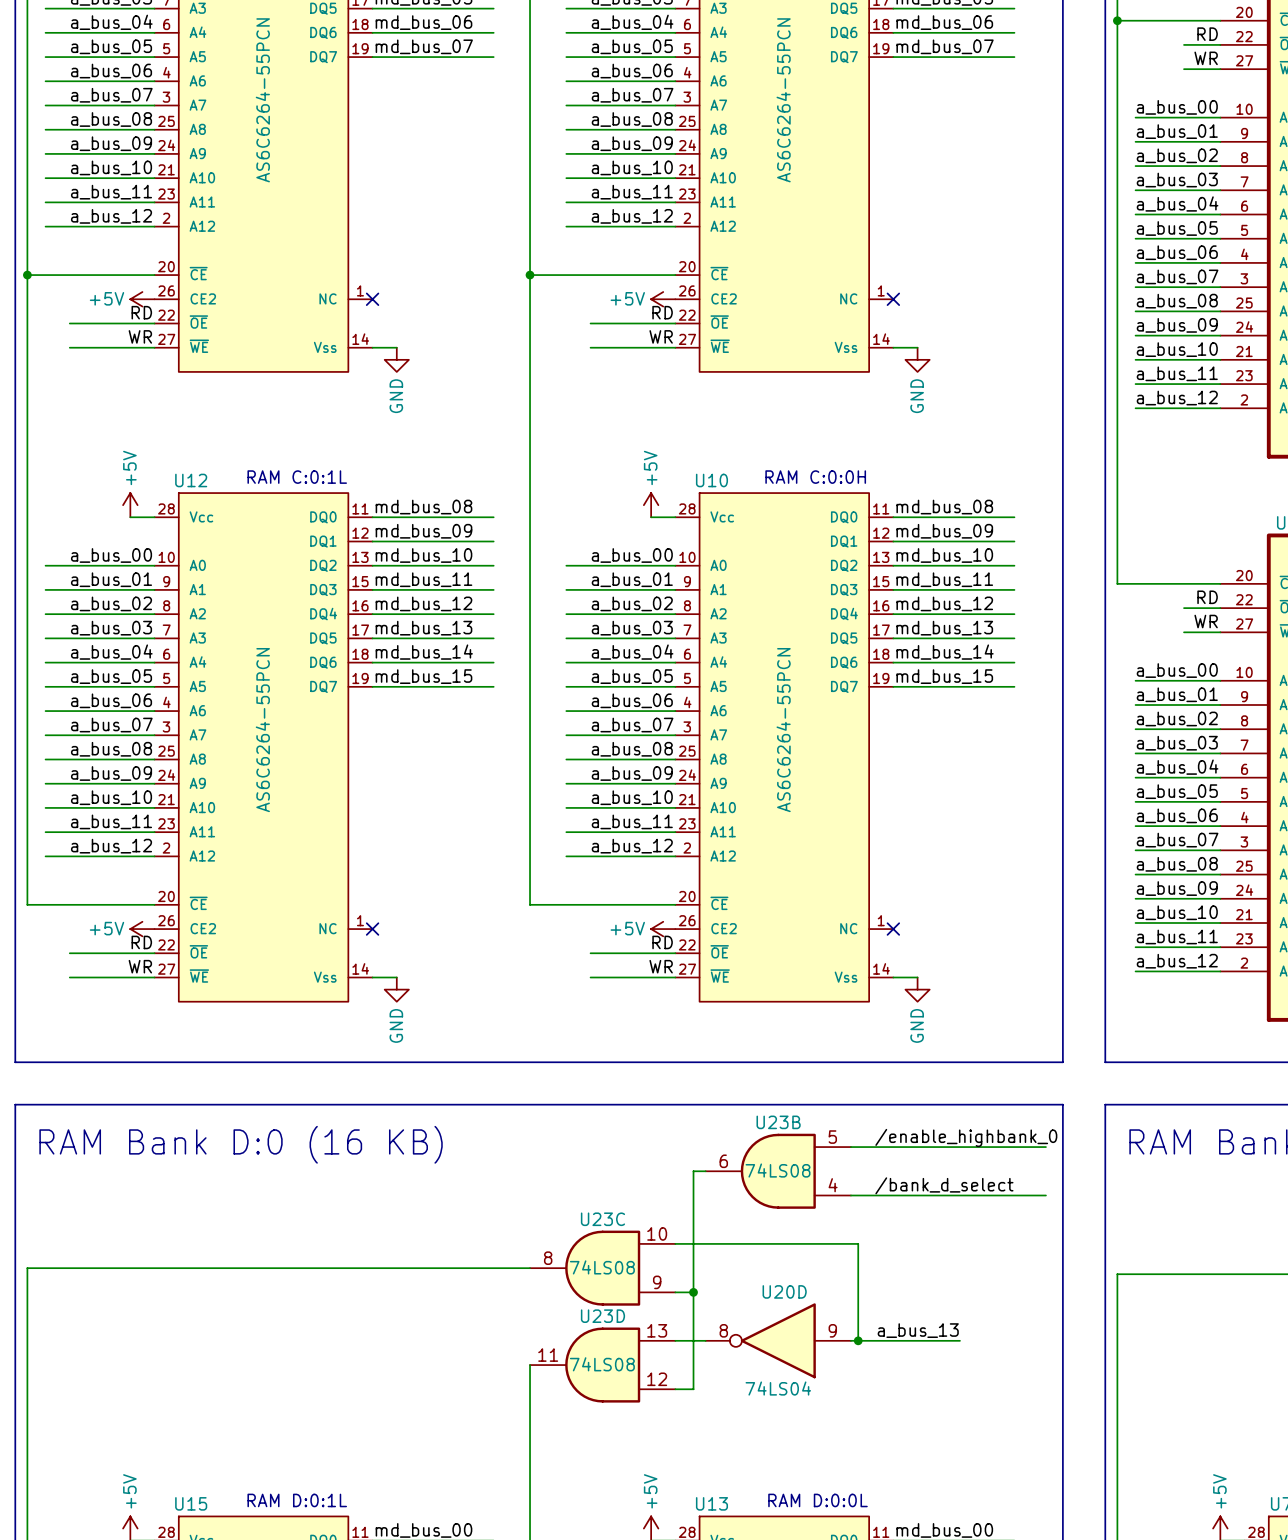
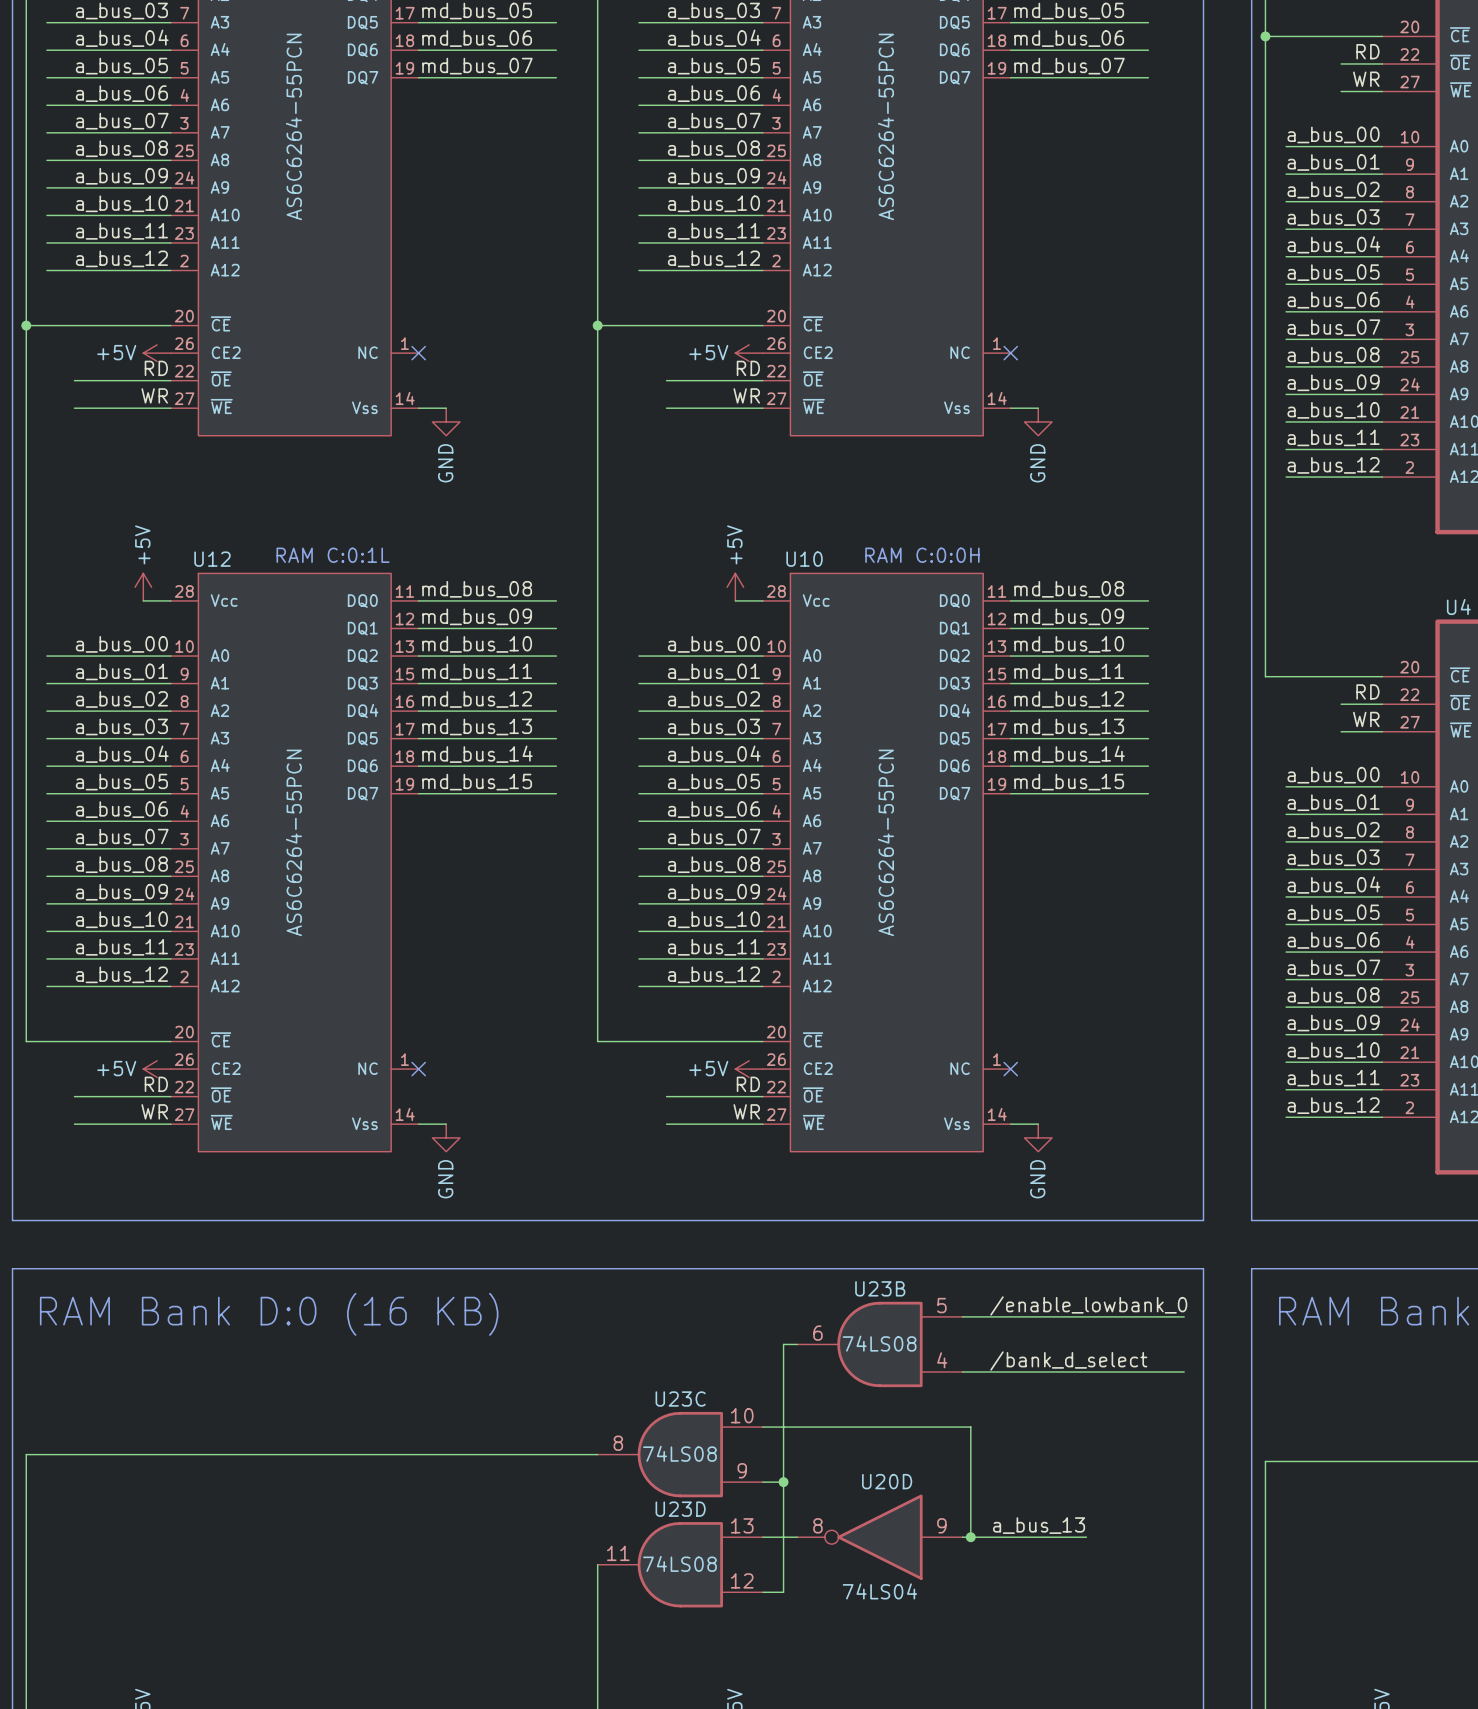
label: /enable_highbank_0 (966, 1137) -> /enable_lowbank_0 (1088, 1305)

